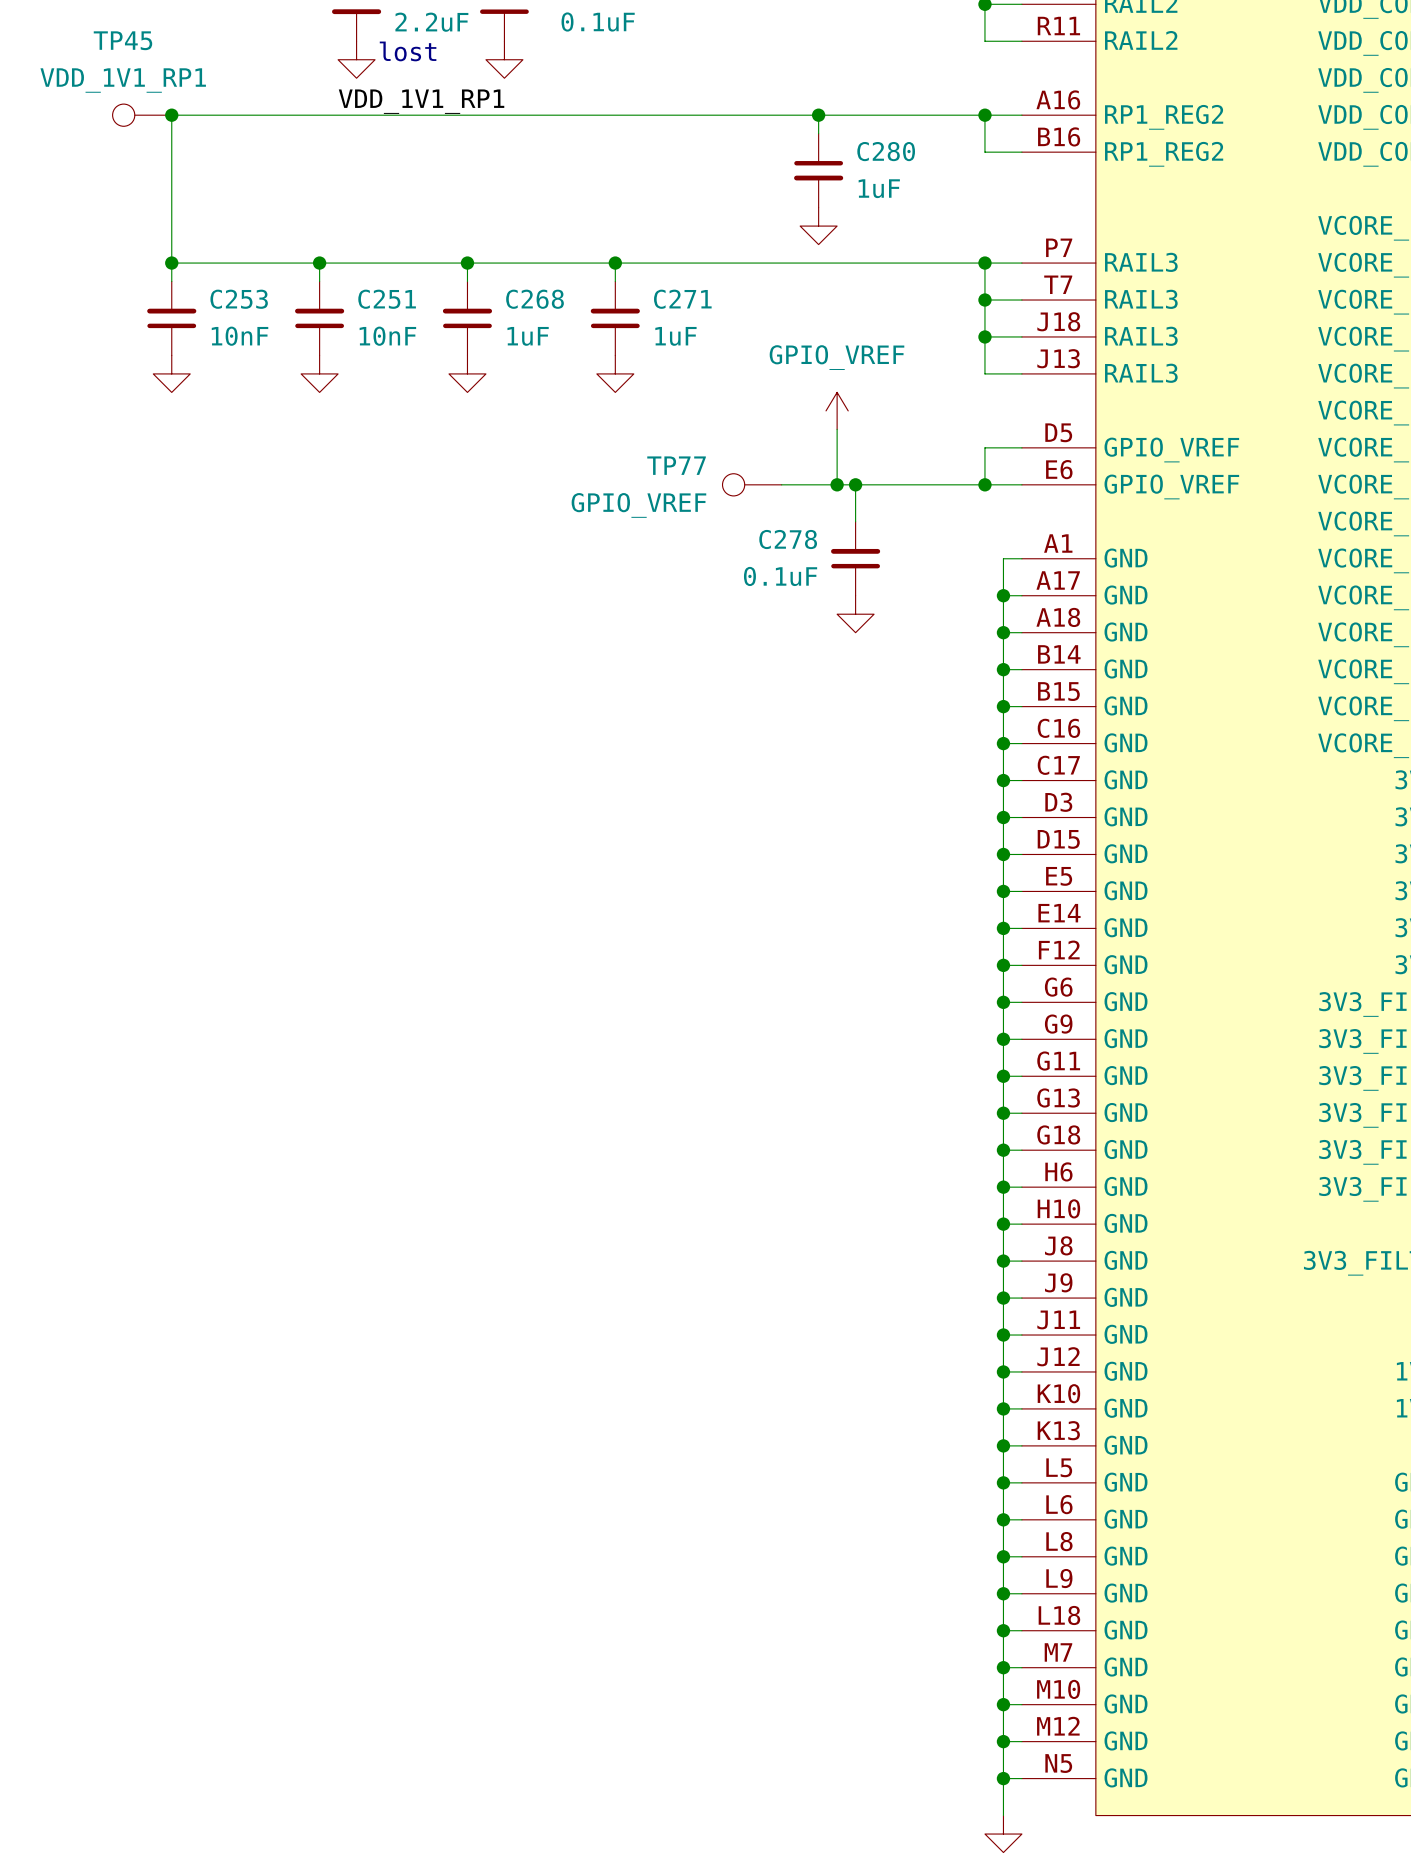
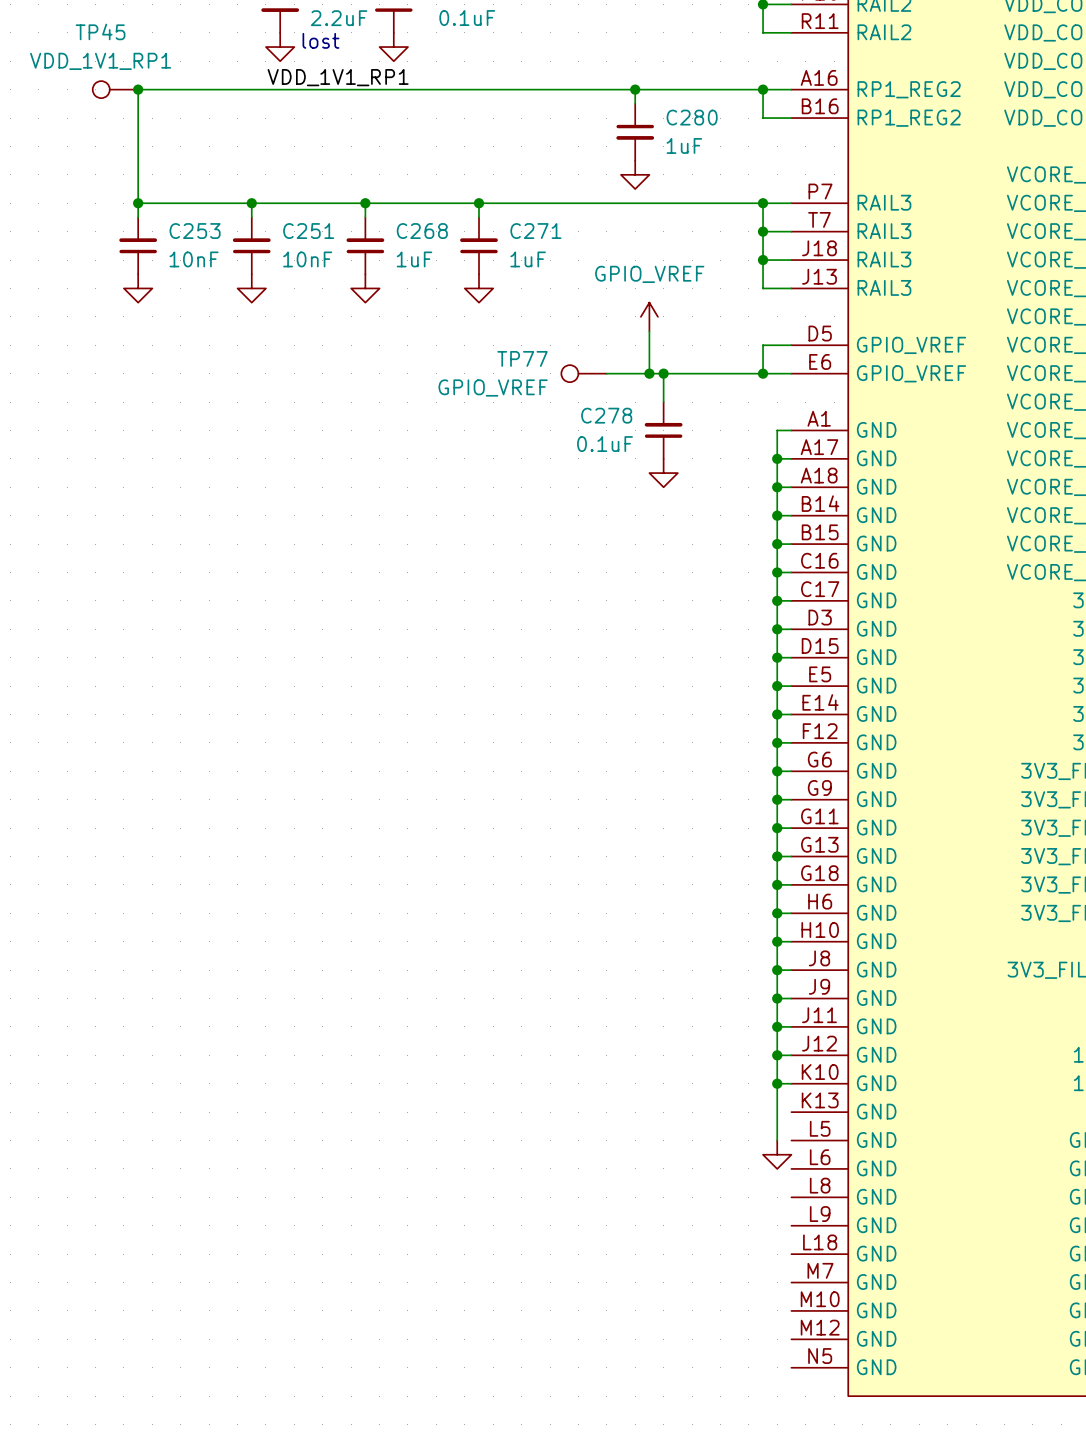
wire: (1003, 1445) (1021, 1445) -> none
junction: (1003, 1445) -> none
junction: (1003, 1482) -> none
wire: (1021, 1482) (1003, 1482) (1003, 1815) -> none
power symbol: none -> (777, 1154)
wire: (1003, 1519) (1021, 1519) -> none
junction: (1003, 1519) -> none
wire: (1003, 1556) (1021, 1556) -> none
junction: (1003, 1556) -> none
wire: (1003, 1593) (1021, 1593) -> none
junction: (1003, 1593) -> none
wire: (1003, 1630) (1021, 1630) -> none
junction: (1003, 1630) -> none
wire: (1003, 1667) (1021, 1667) -> none
junction: (1003, 1667) -> none
wire: (1003, 1704) (1021, 1704) -> none
junction: (1003, 1704) -> none
wire: (1003, 1741) (1021, 1741) -> none
junction: (1003, 1741) -> none
wire: (1003, 1778) (1021, 1778) -> none
junction: (1003, 1778) -> none
power symbol: (1003, 1834) -> none

